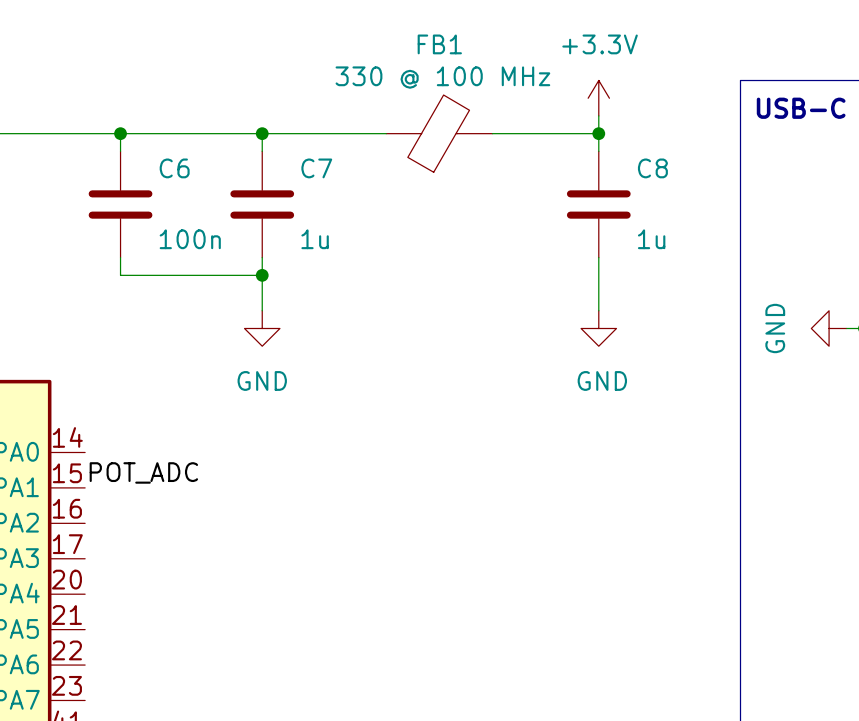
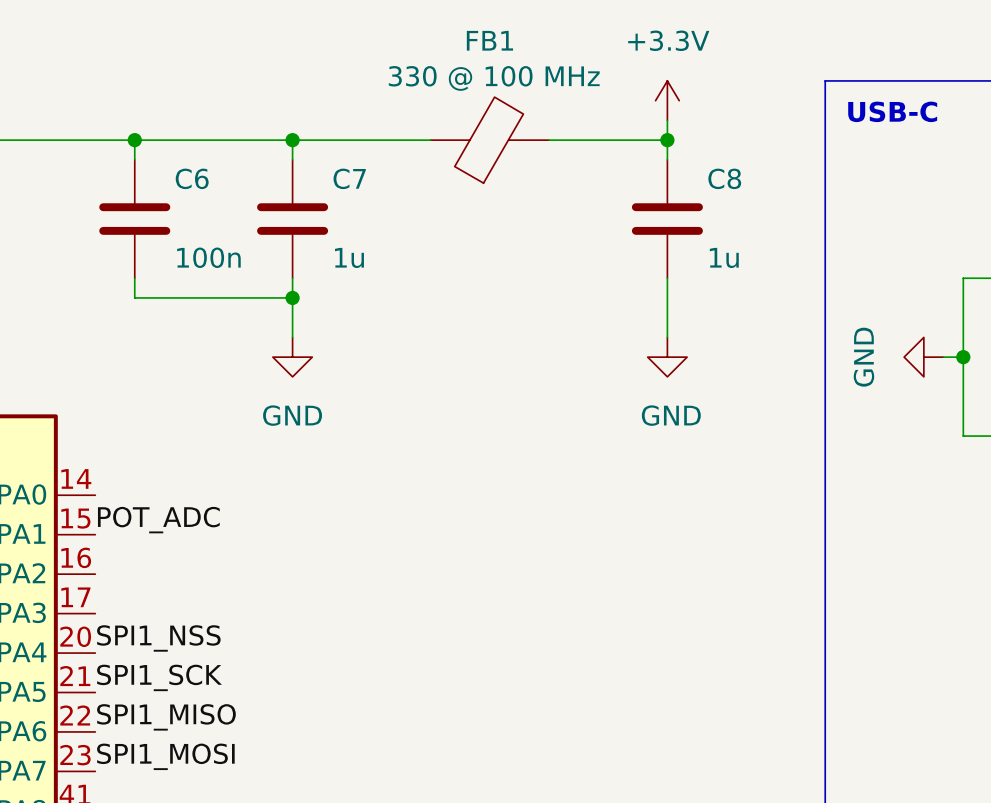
label: none -> SPI1_NSS (158, 638)
label: none -> SPI1_SCK (159, 677)
label: none -> SPI1_MISO (166, 717)
label: none -> SPI1_MOSI (165, 756)

